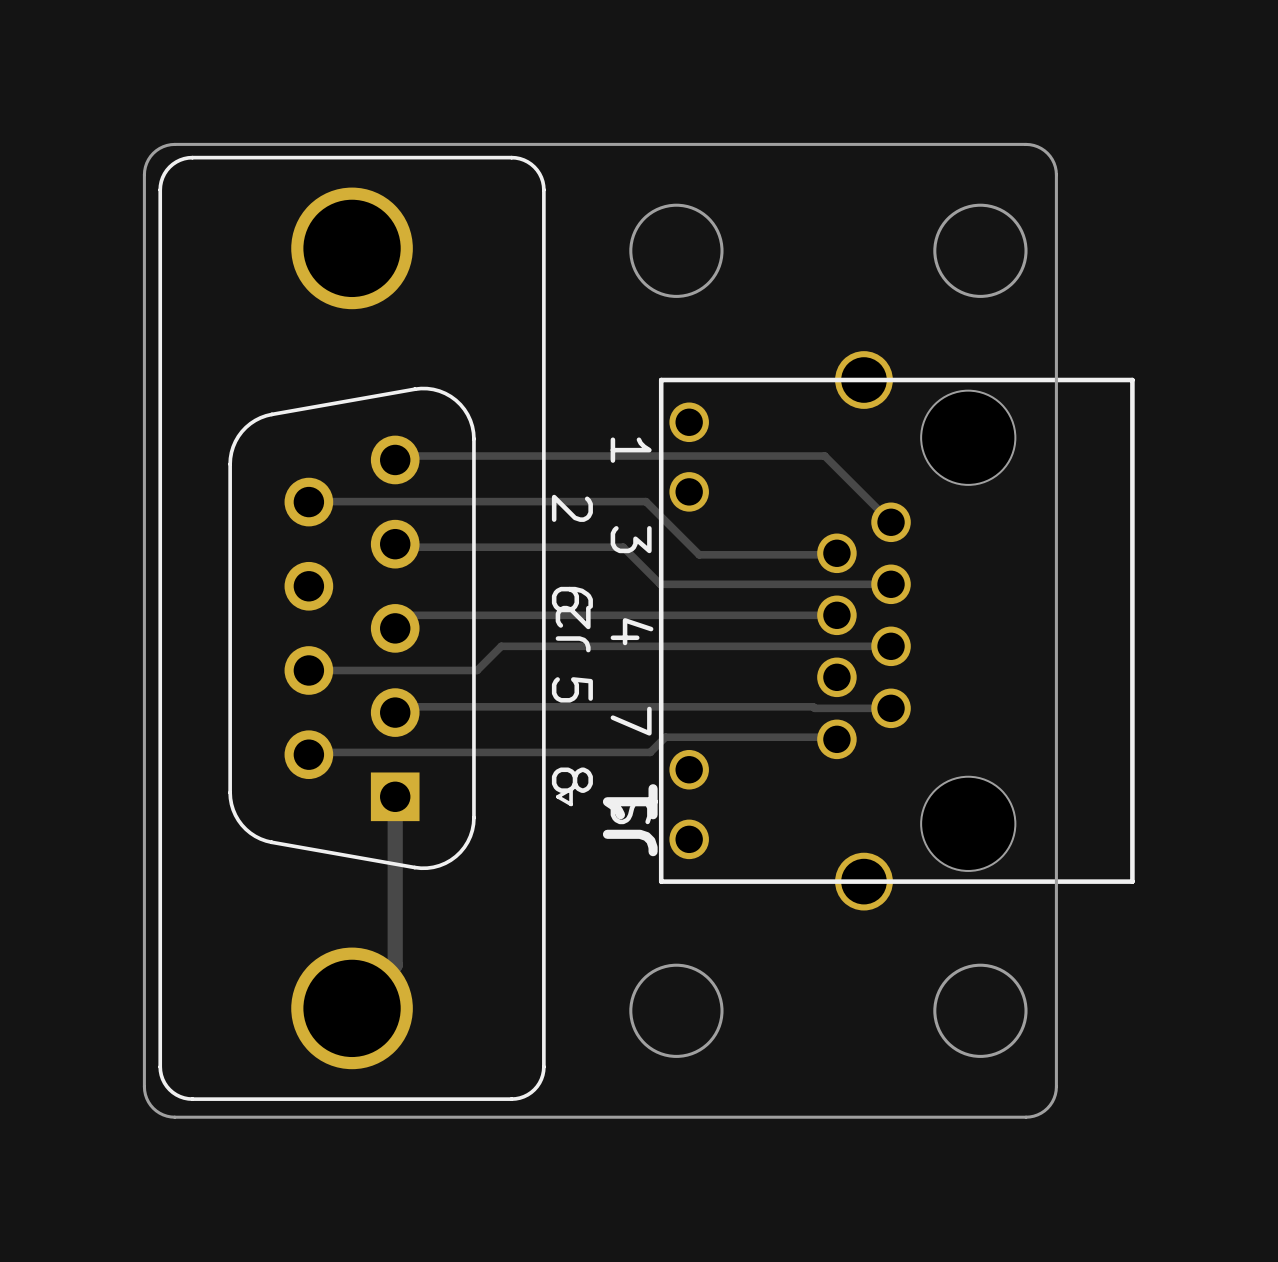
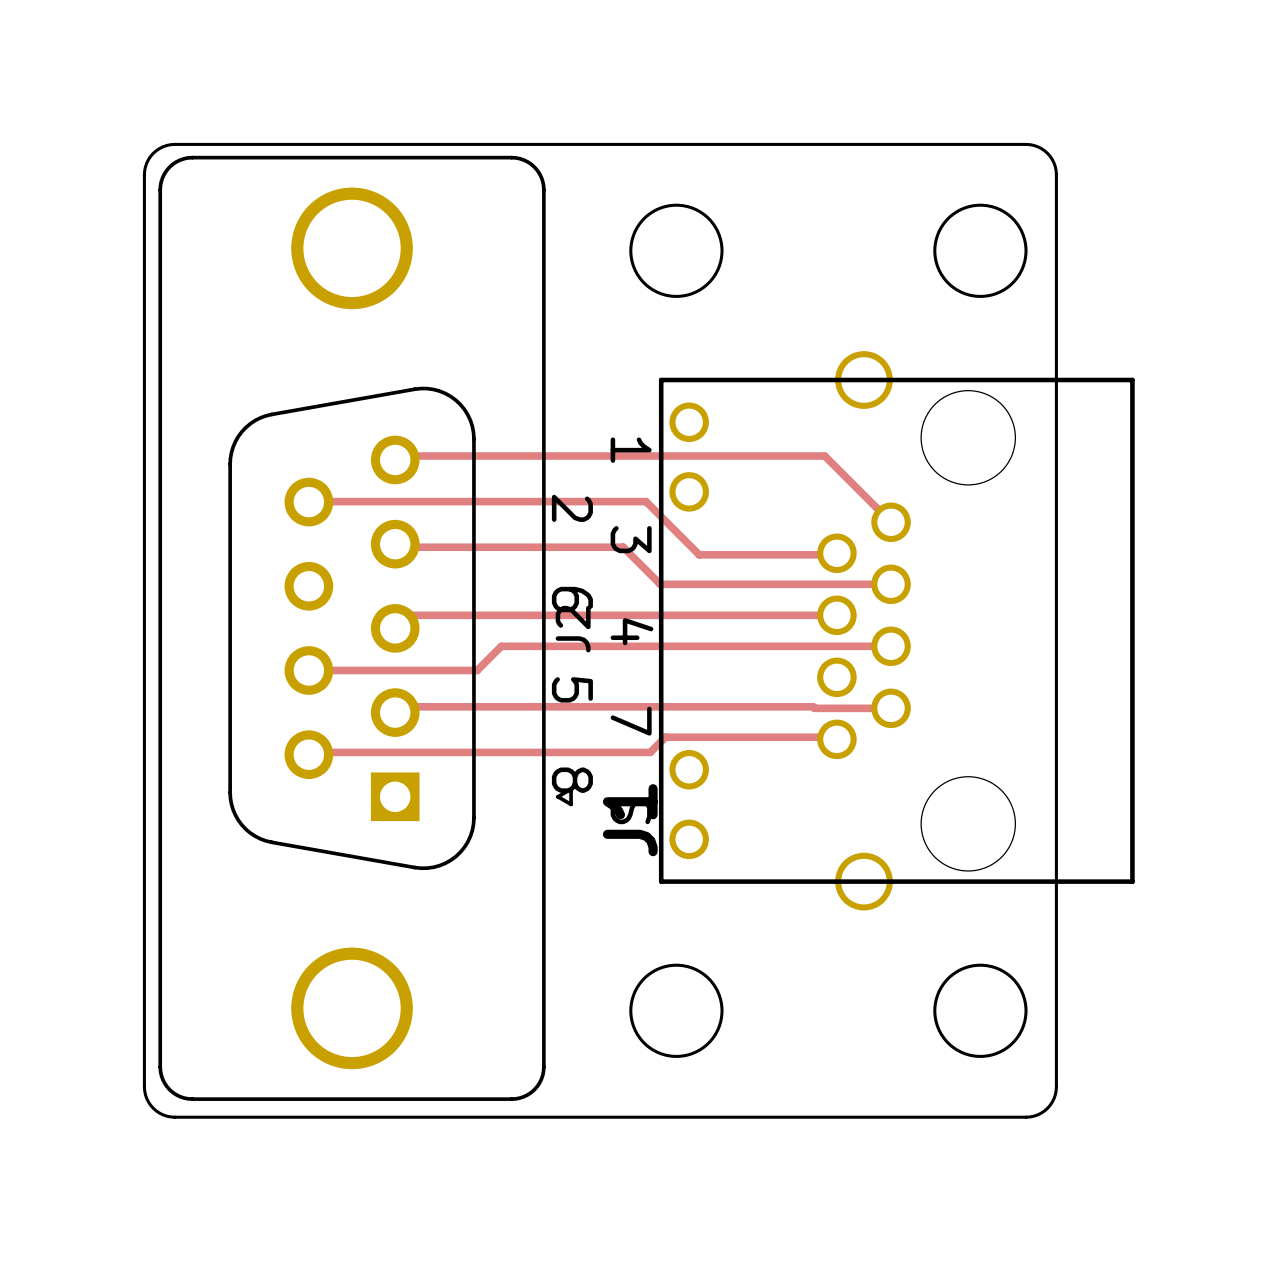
track: (395, 796) (395, 965) (352, 1008) -> none

